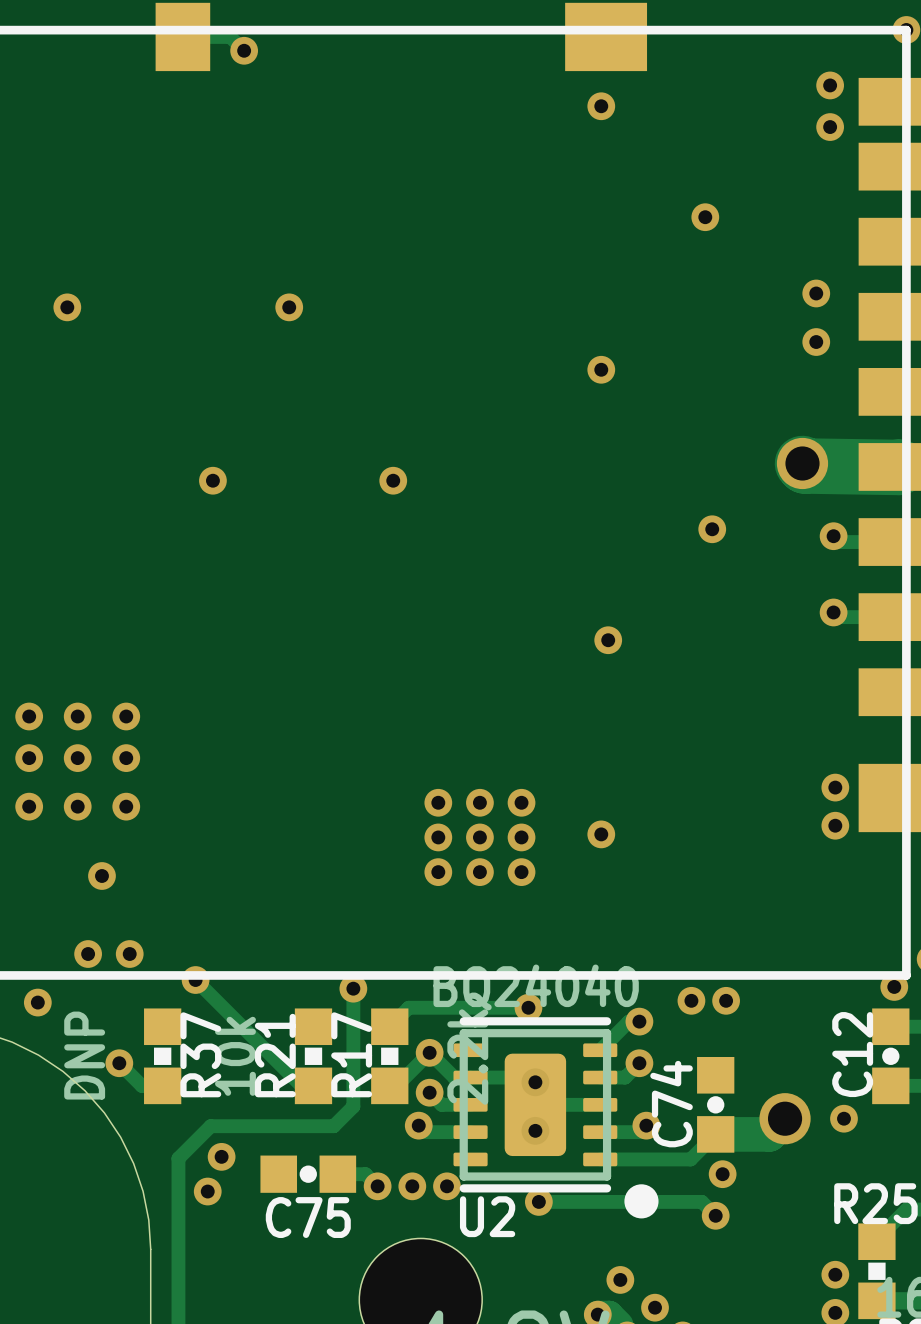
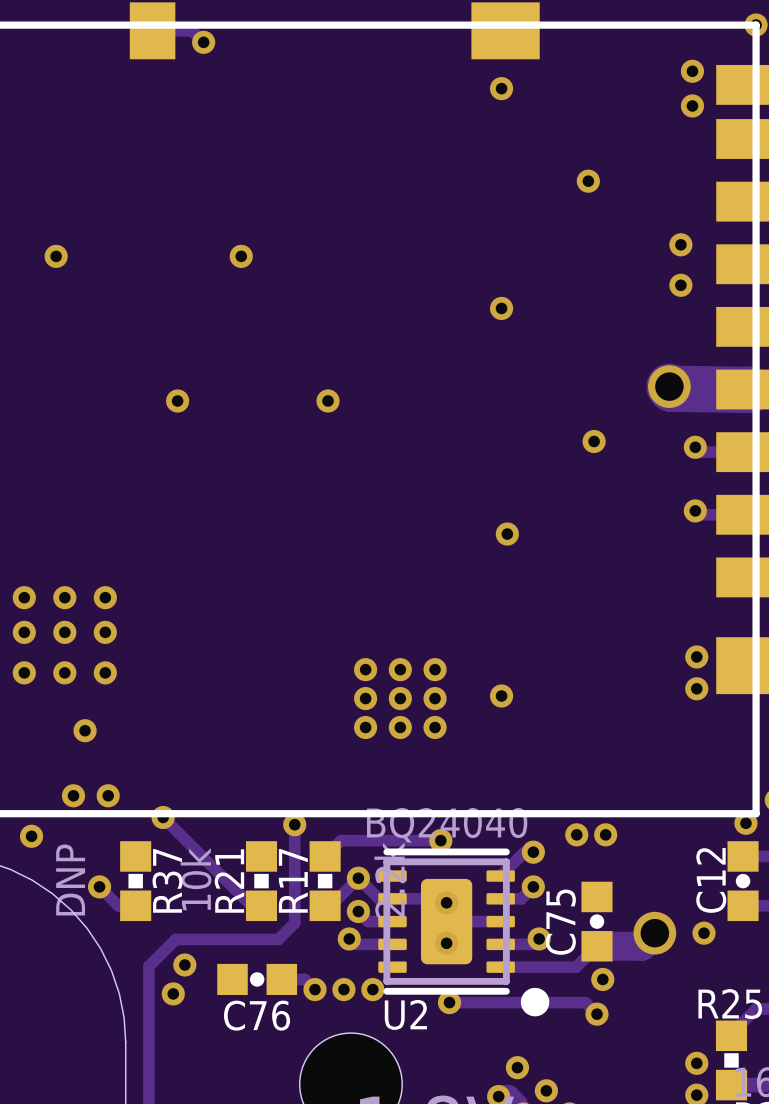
C74 name: C74 (671, 1104) -> C75 (560, 922)
C75 name: C75 (308, 1217) -> C76 (257, 1015)

